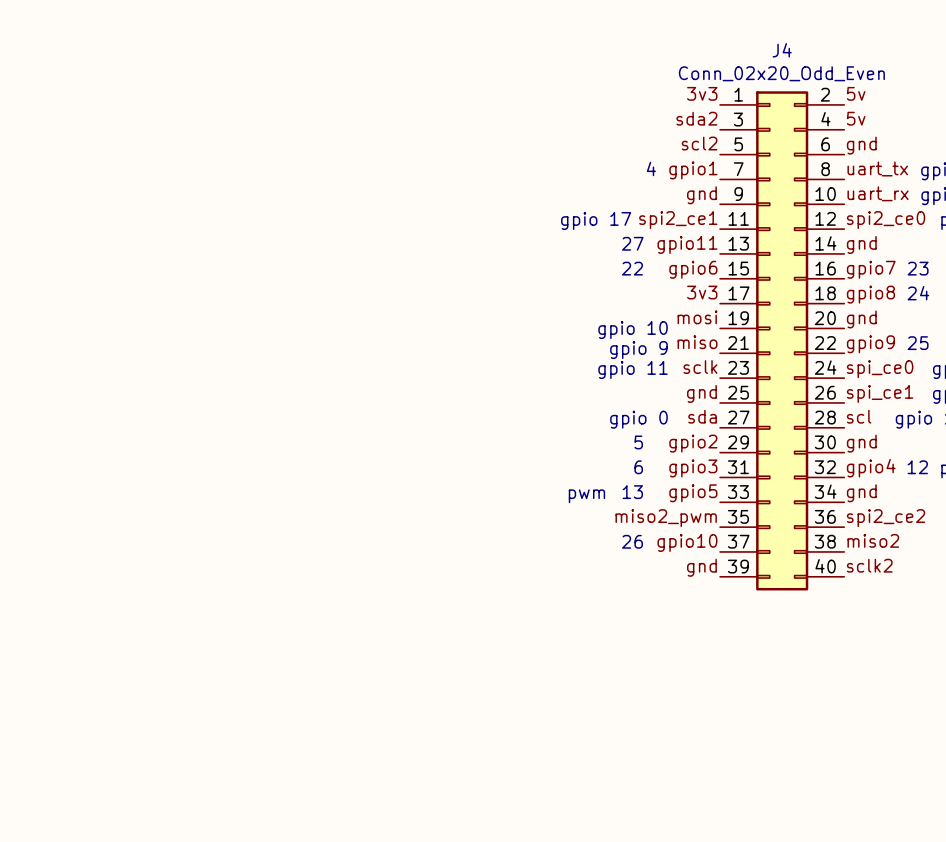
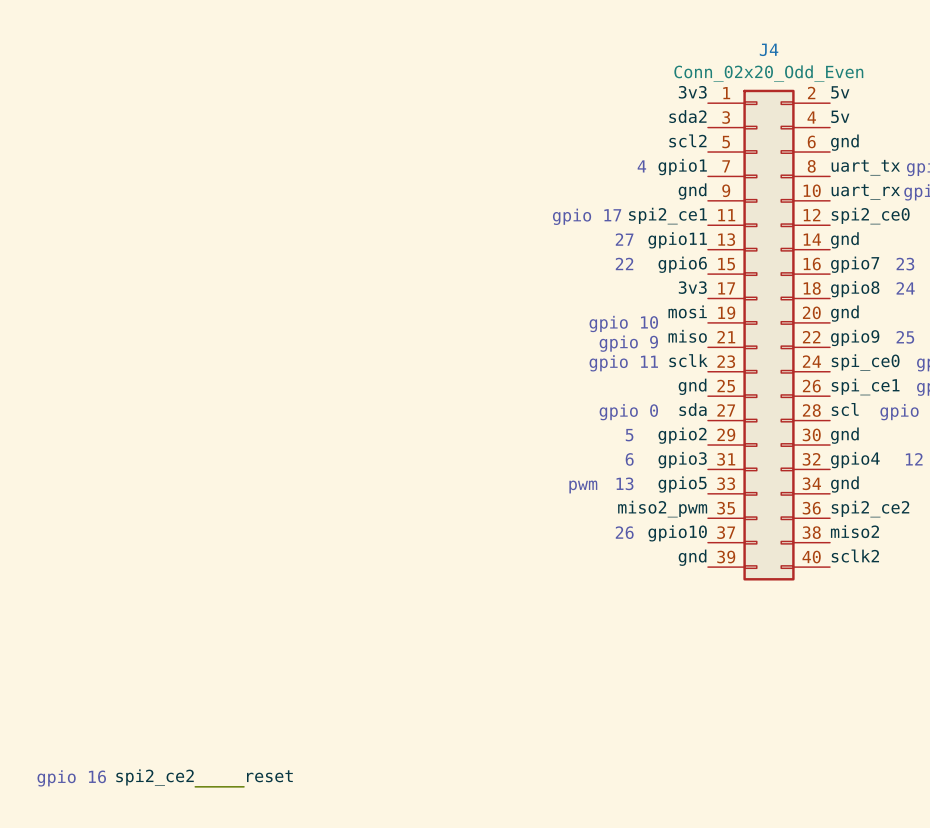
label: none -> reset (269, 776)
label: none -> spi2_ce2 (155, 777)
text: none -> gpio 16 (71, 778)
wire: none -> (195, 786) (244, 786)

